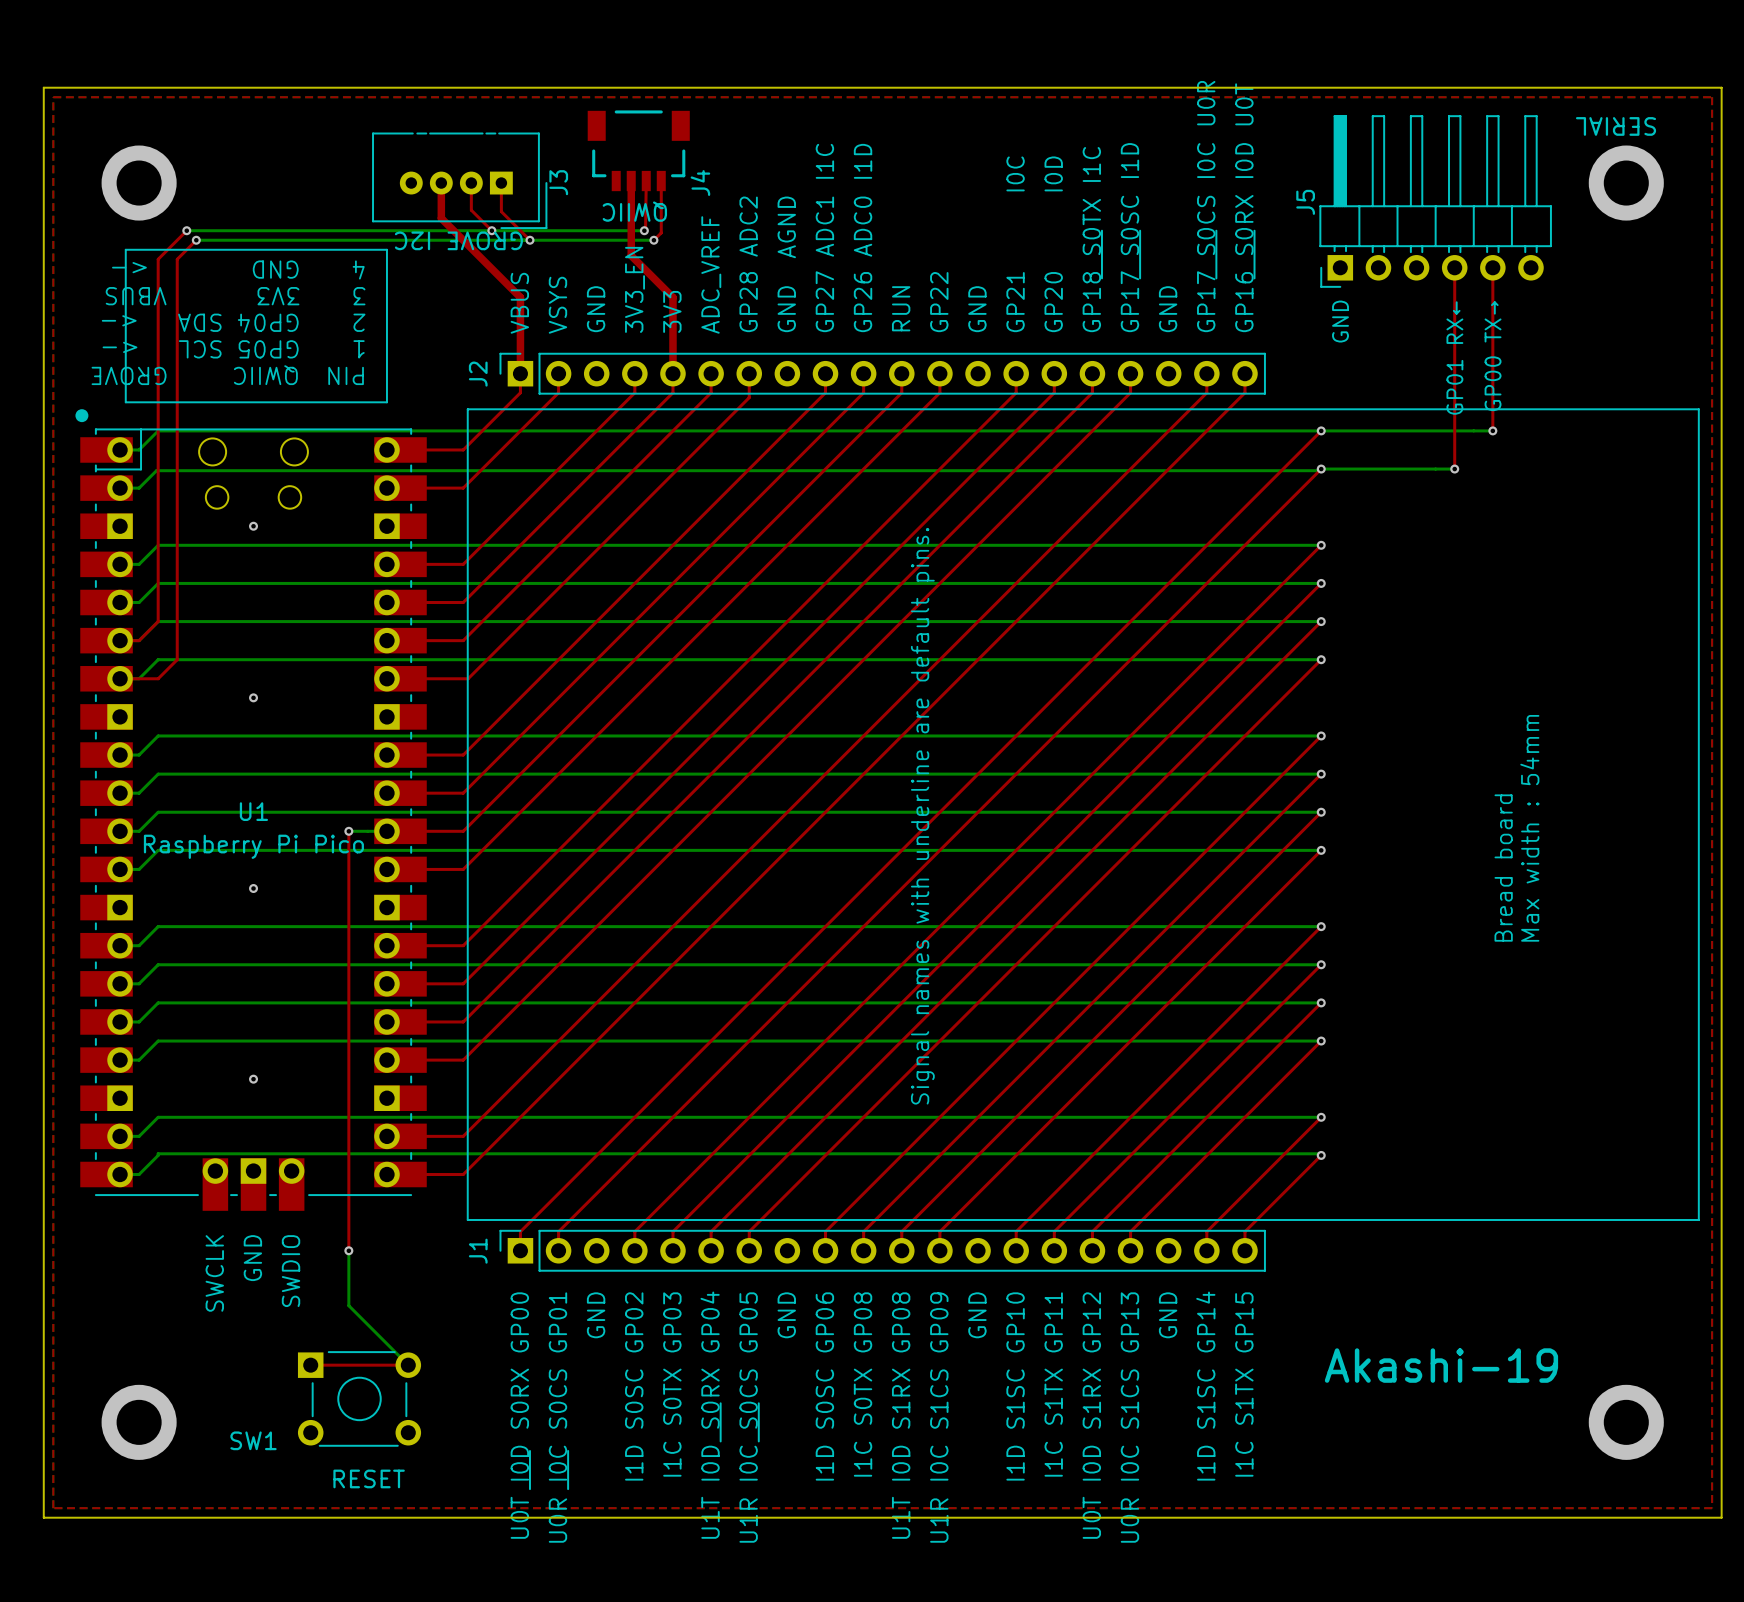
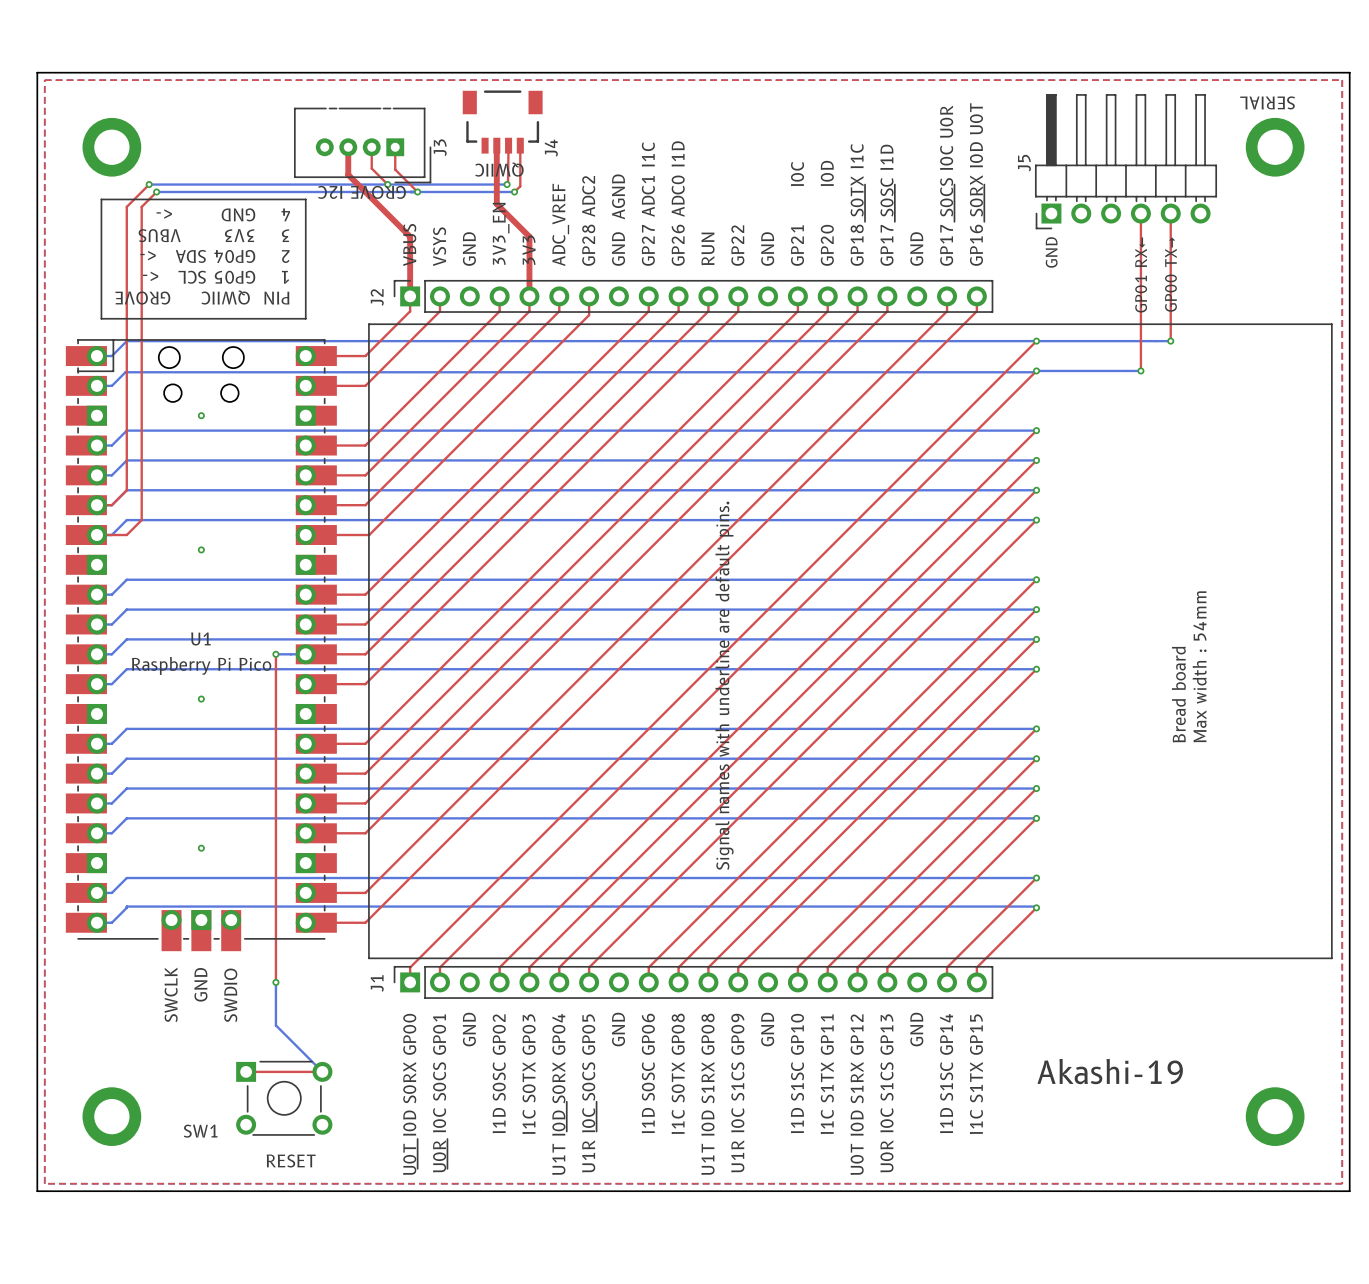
drawing: [75, 409, 89, 423] -> none

